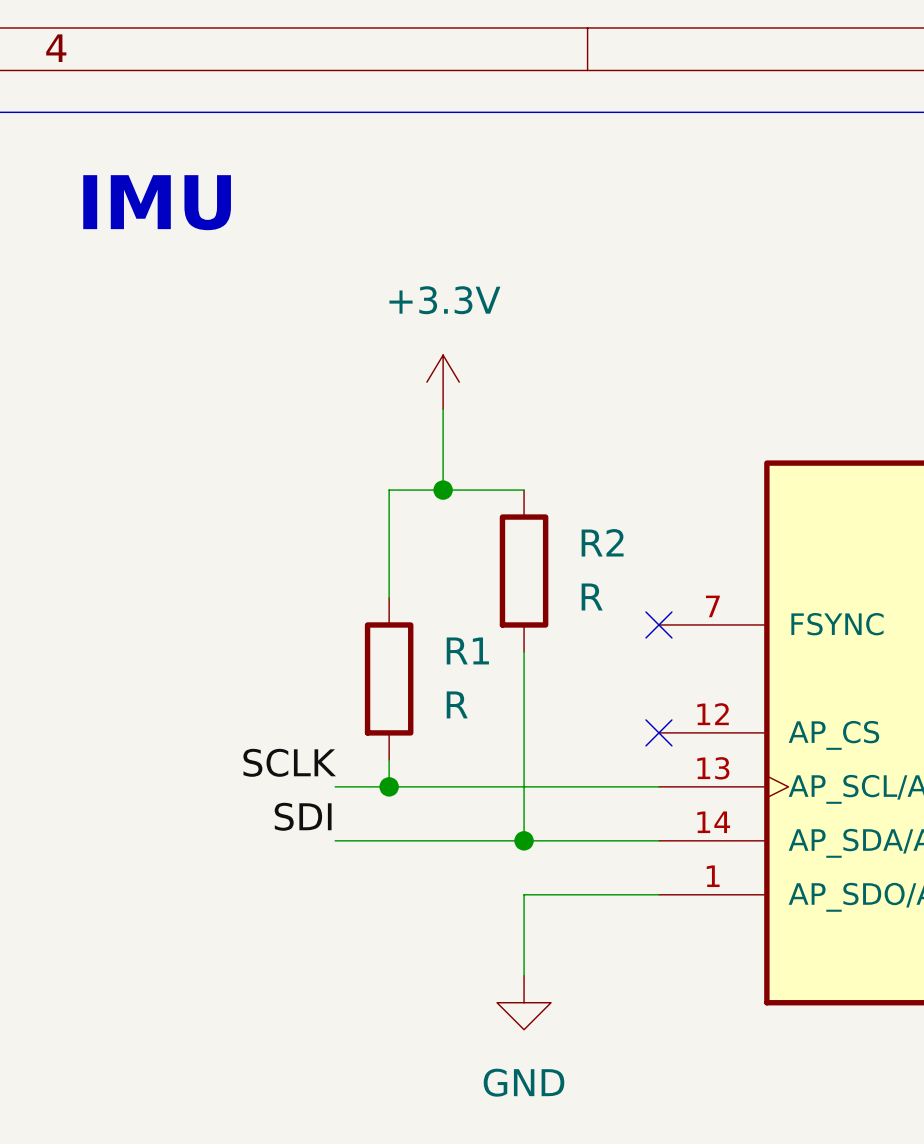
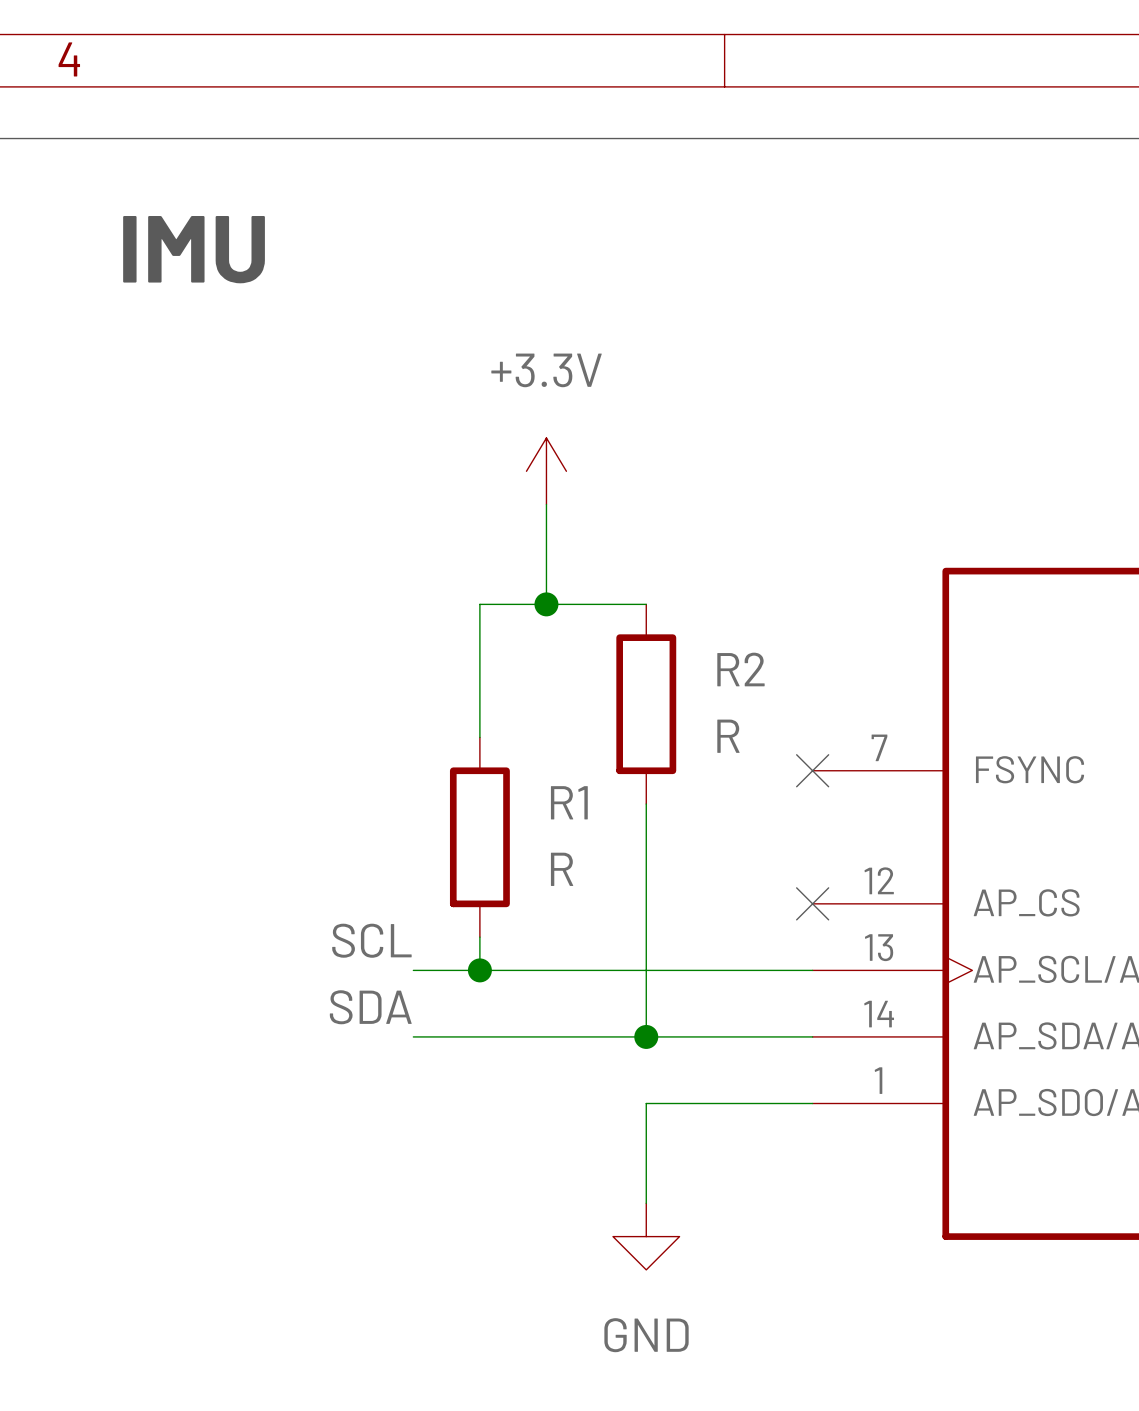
label: SCLK (289, 762) -> SCL (371, 940)
label: SDI (303, 816) -> SDA (370, 1007)

